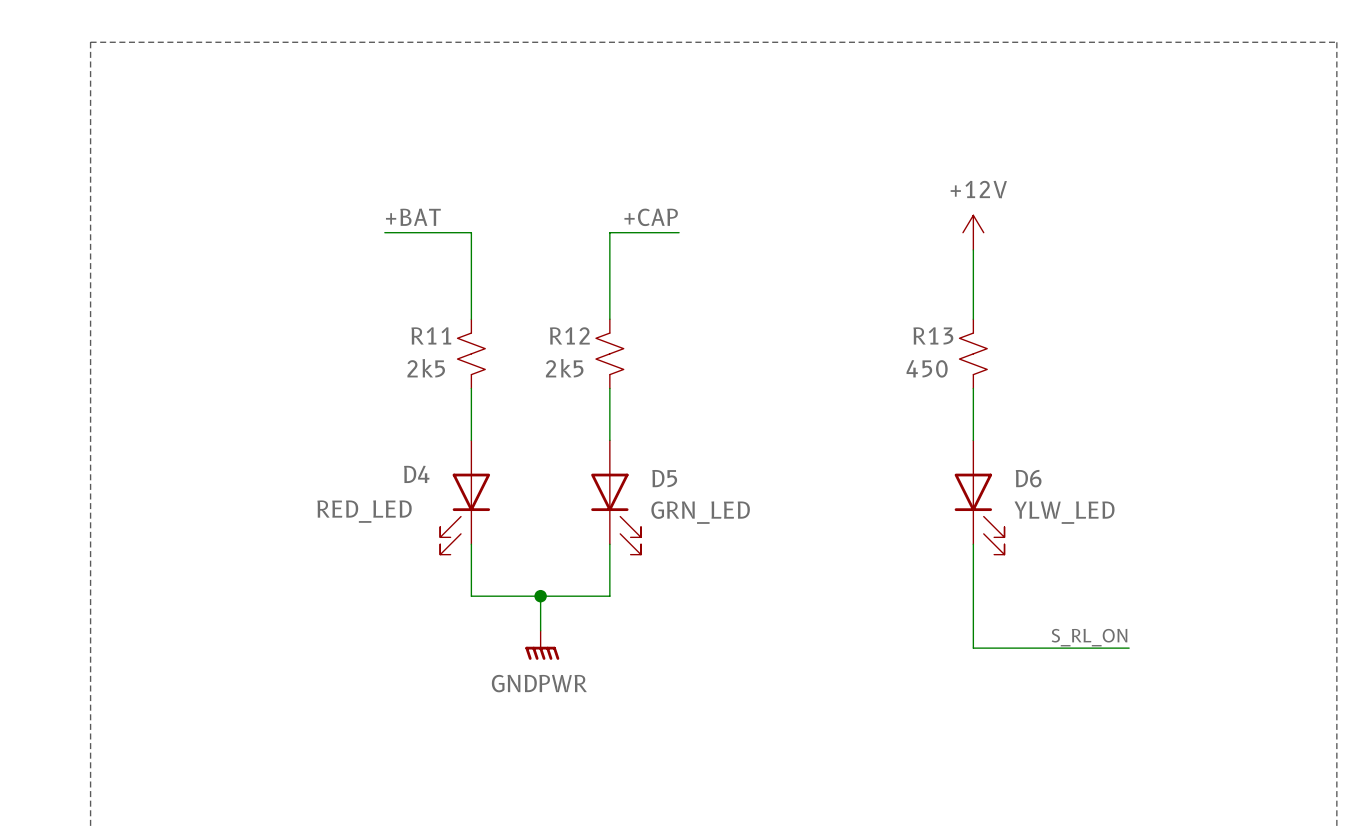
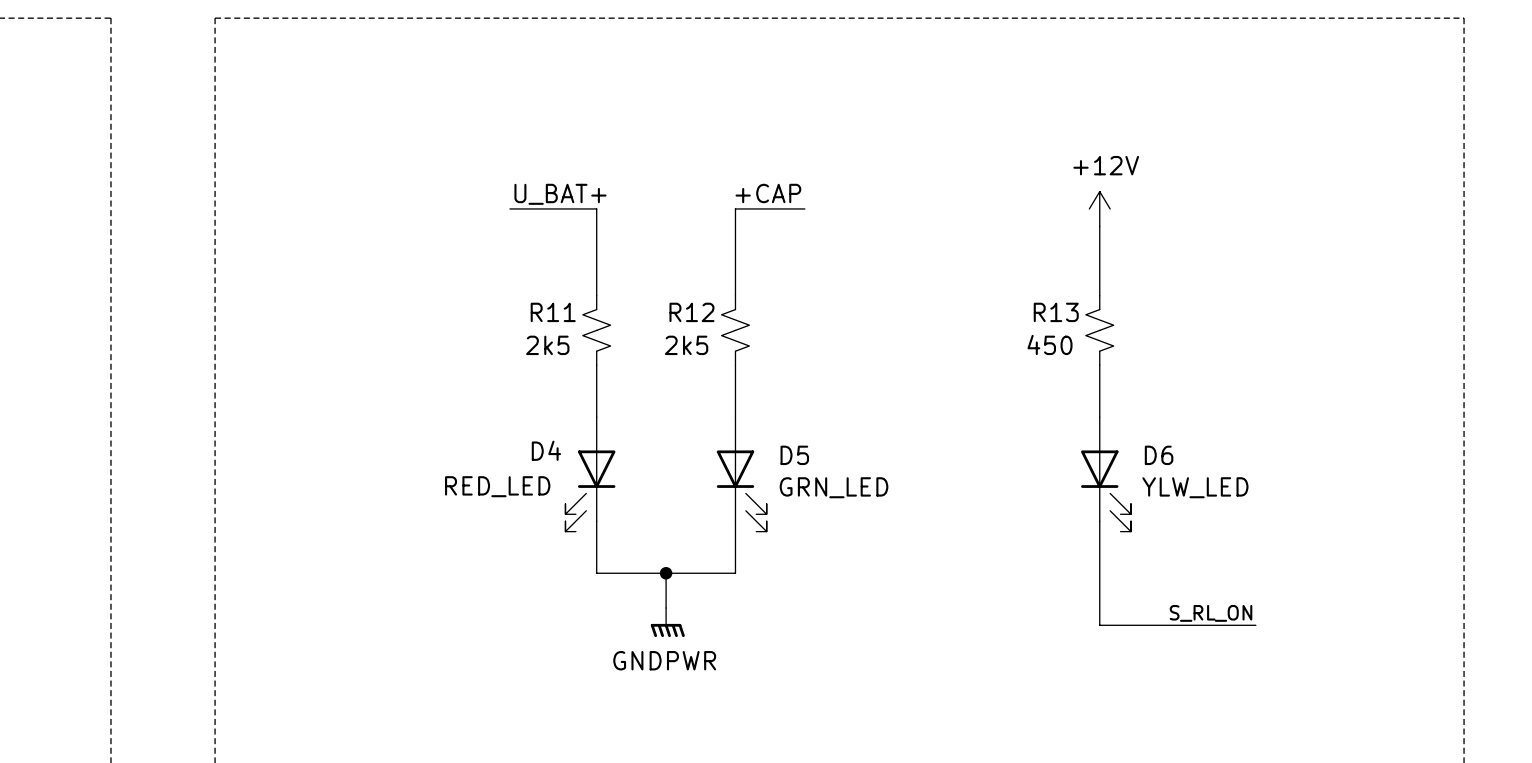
label: +BAT (413, 217) -> U_BAT+ (560, 194)

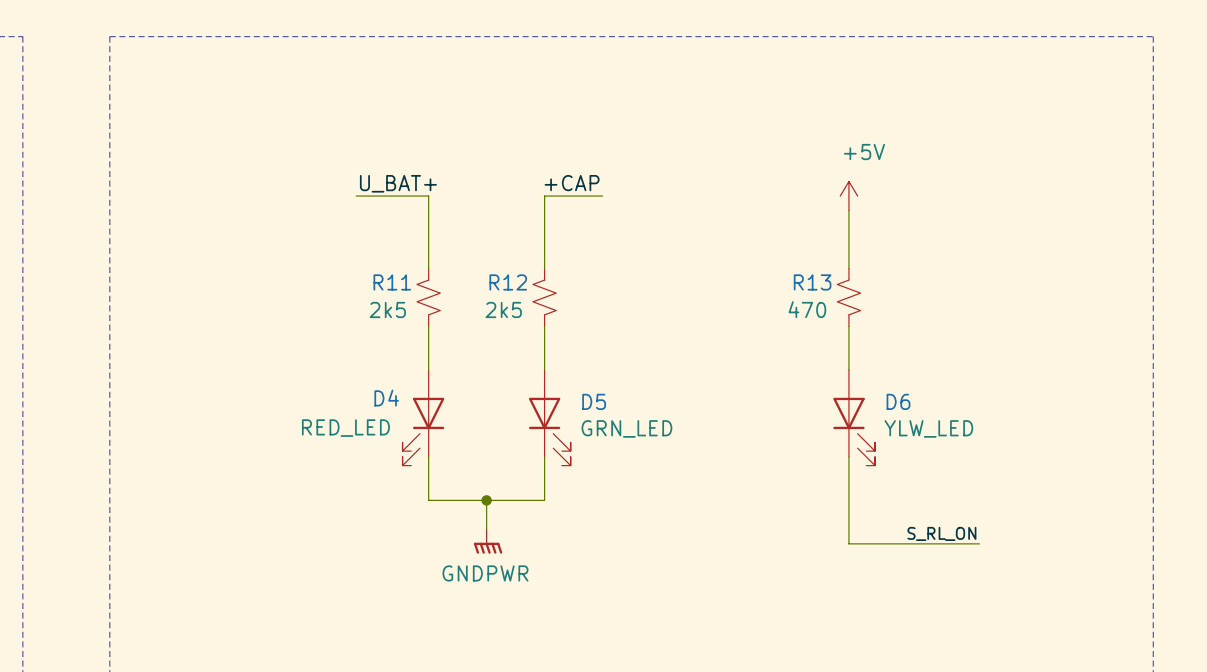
power symbol: +12V (1099, 208) -> +5V (848, 196)
R13 value: 450 (1050, 344) -> 470 (807, 309)

